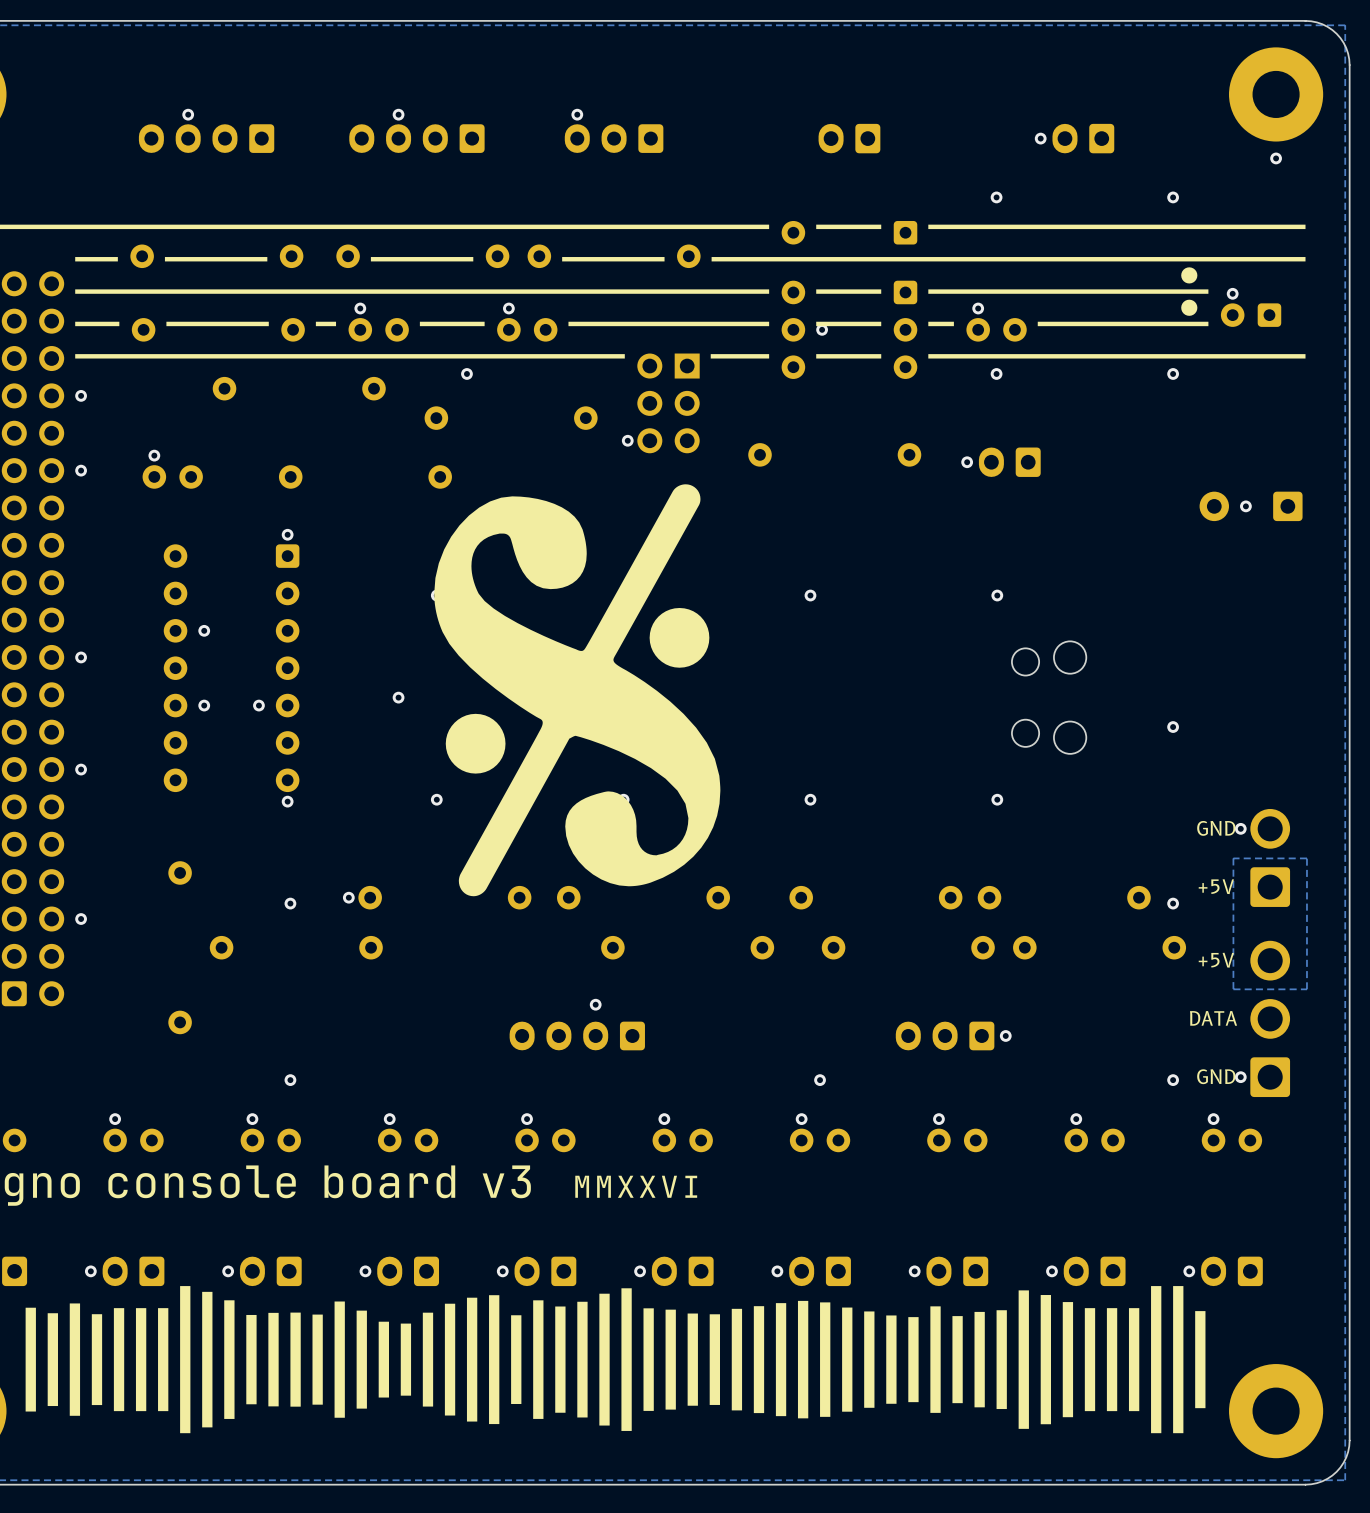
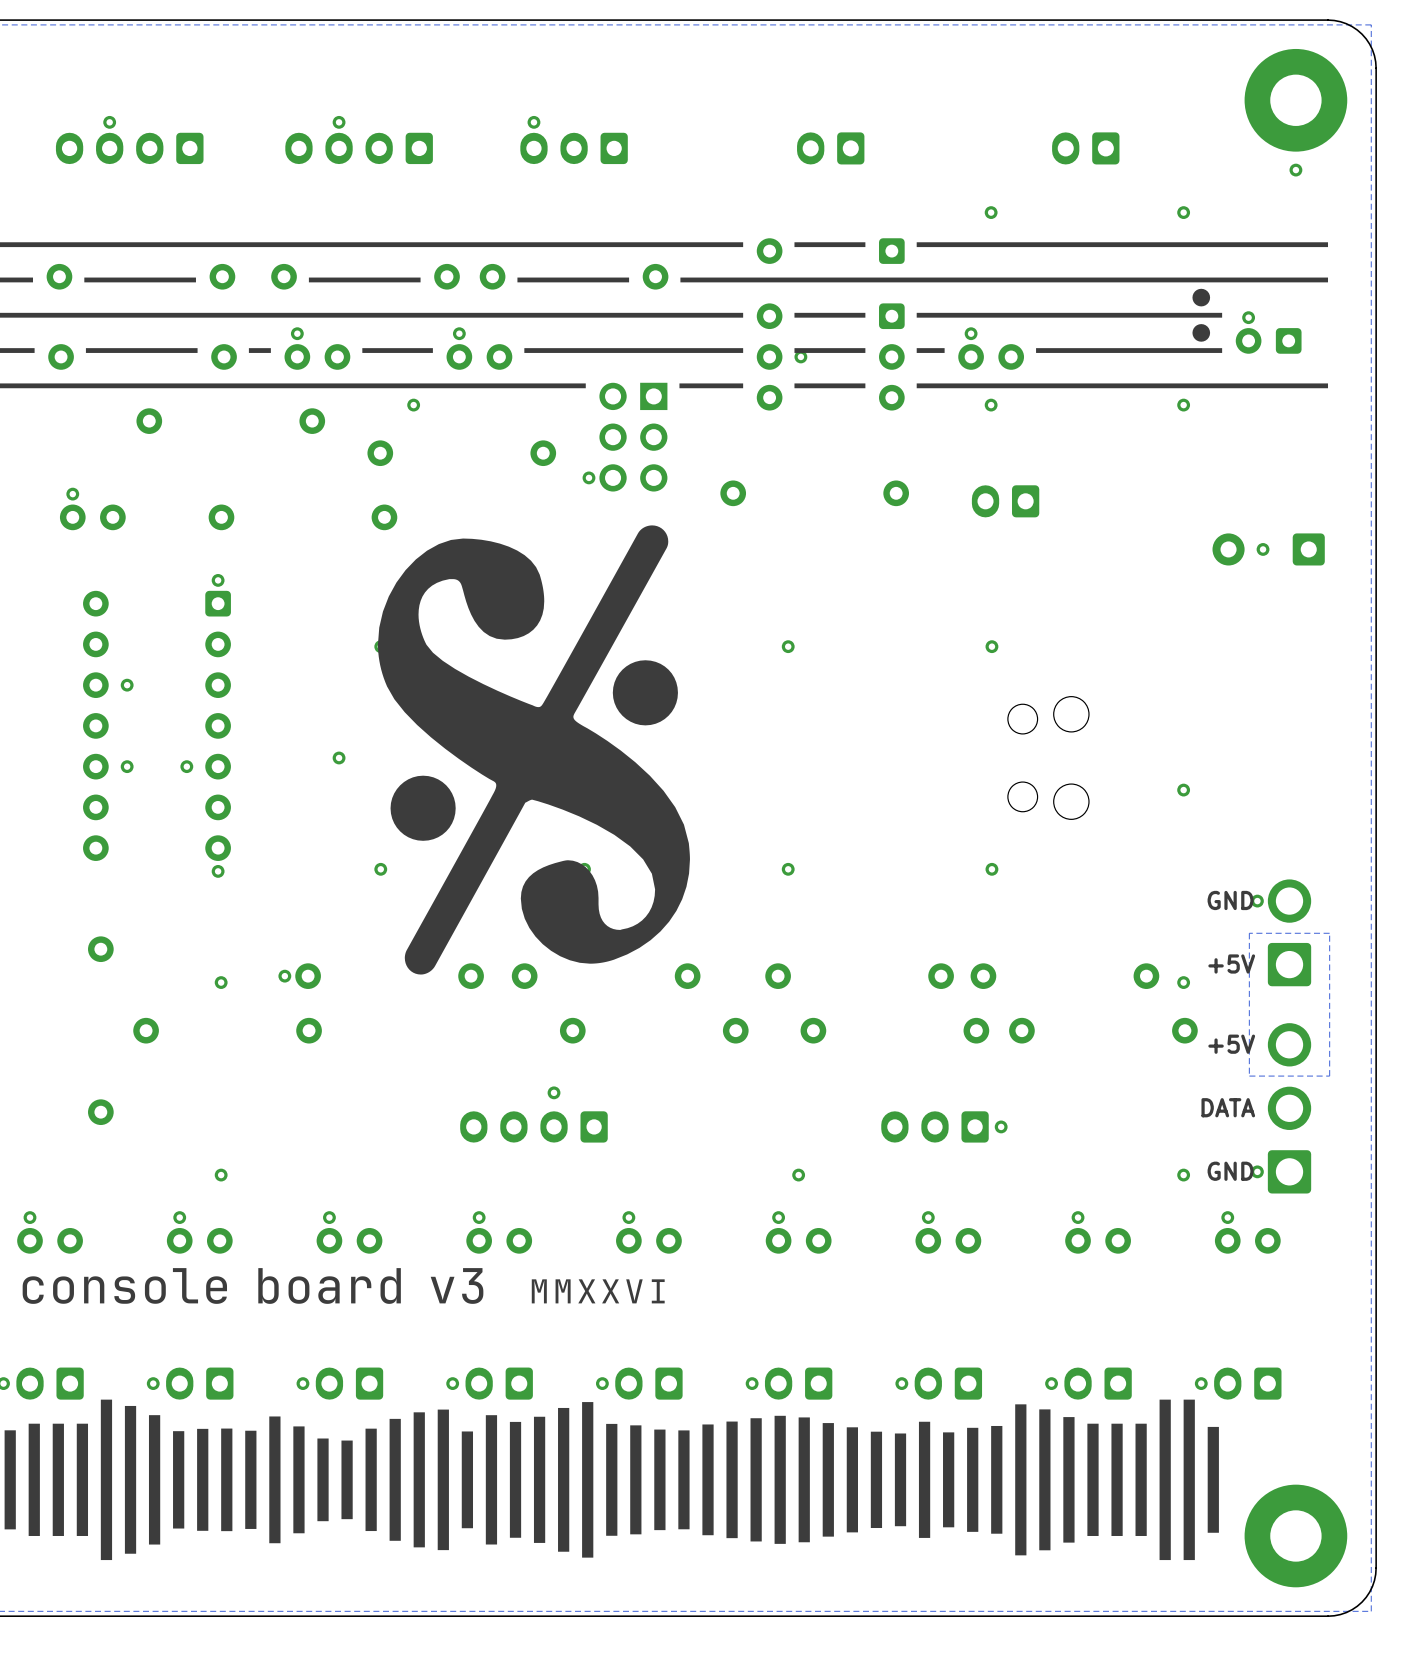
via: (1040, 138) -> none
via: (967, 462) -> none

